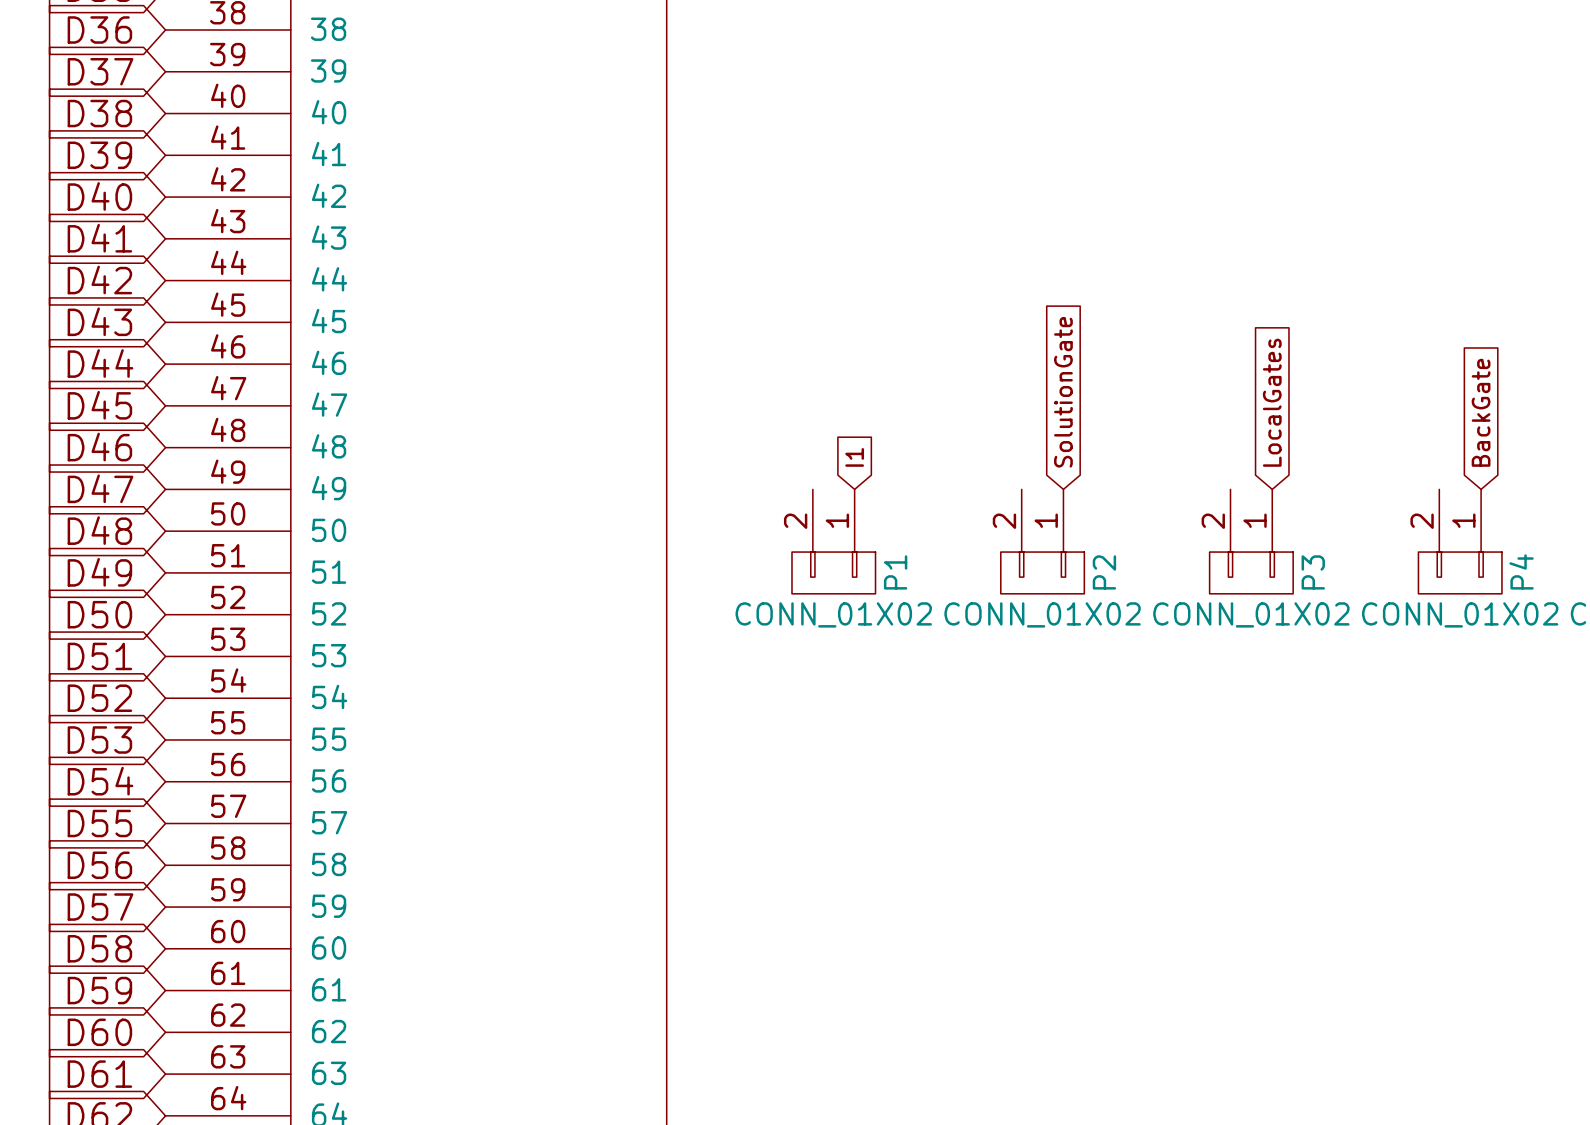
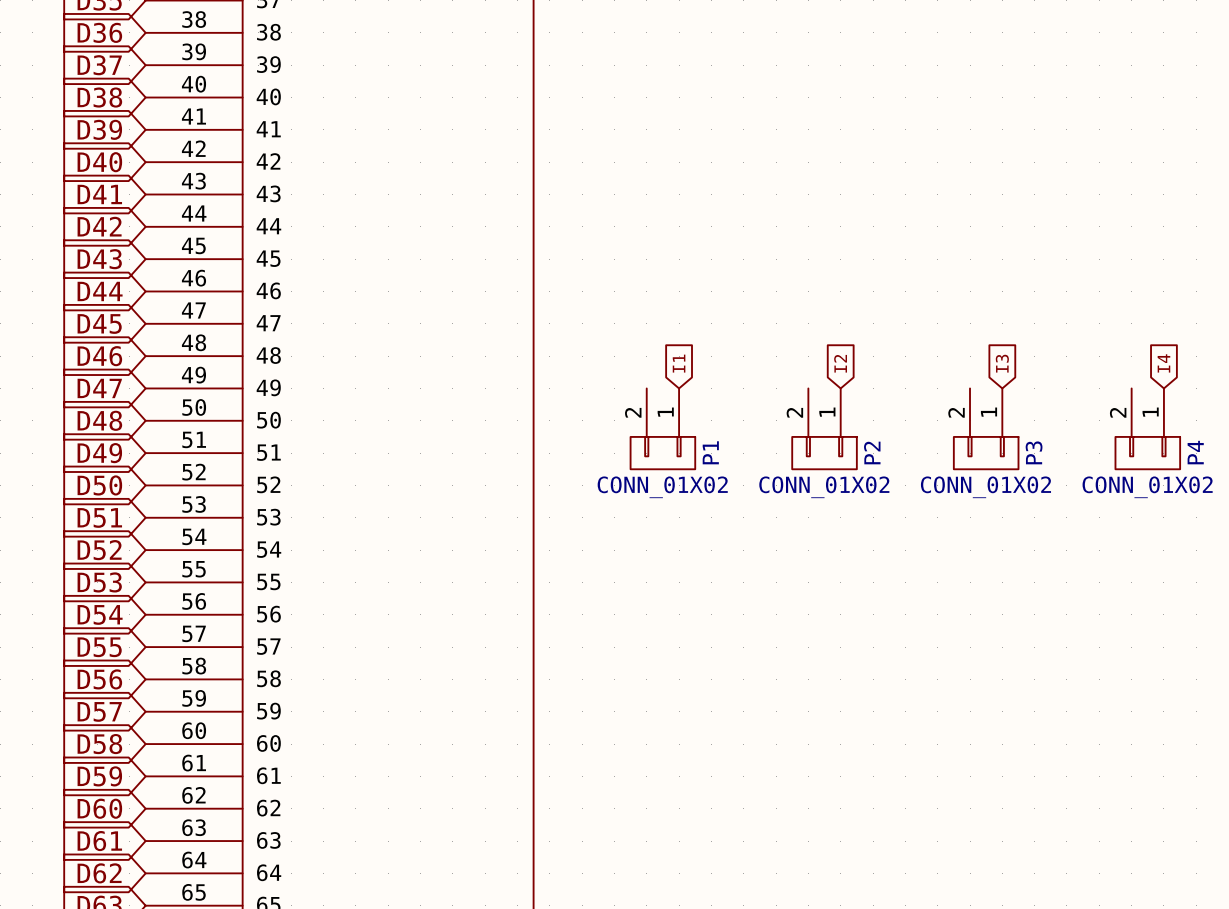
global label: SolutionGate (1063, 392) -> I2 (840, 363)
global label: LocalGates (1272, 402) -> I3 (1002, 363)
global label: BackGate (1481, 412) -> I4 (1163, 363)

